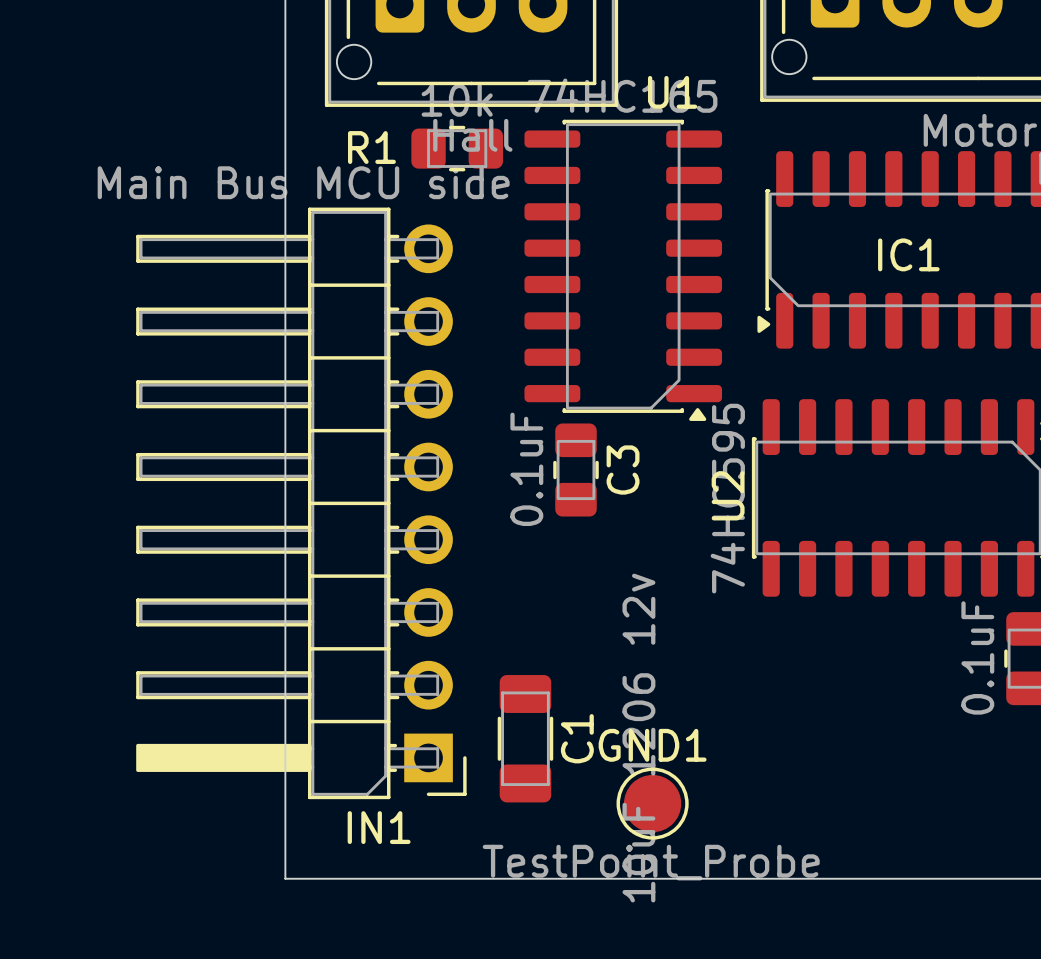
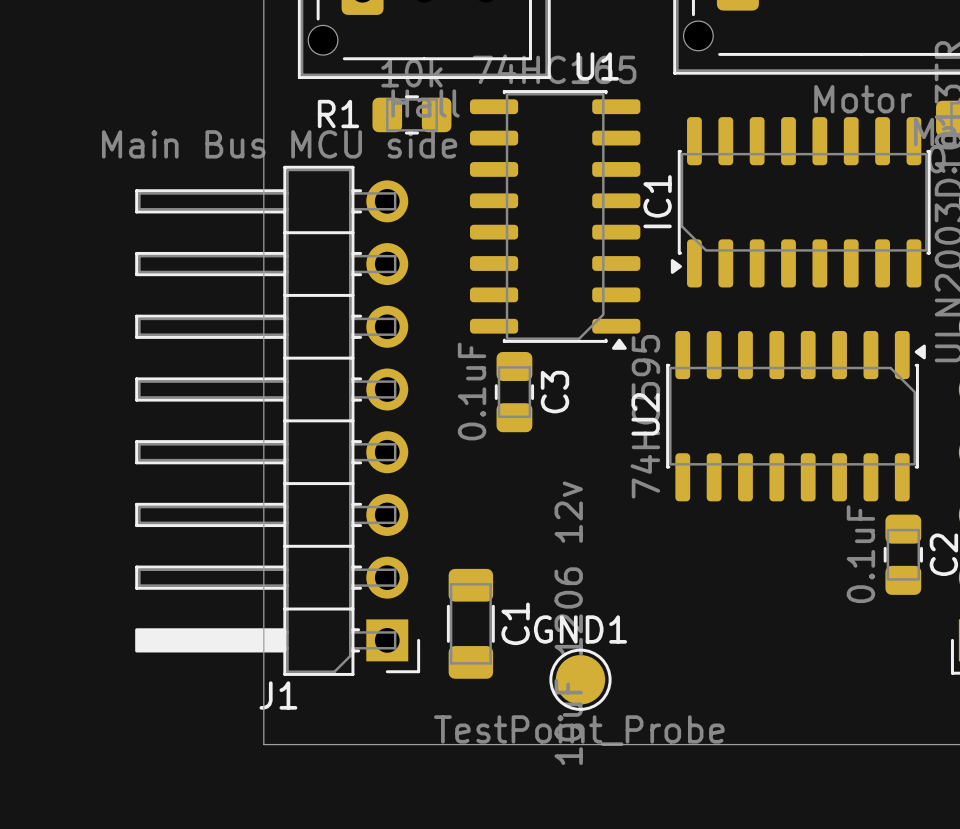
IC1 name rotation: 0° (908, 254) -> 90° counterclockwise (657, 201)
IC1 name position: IC1 (908, 254) -> IC1 (657, 201)
IN1 name: IN1 (379, 827) -> J1 (278, 695)

